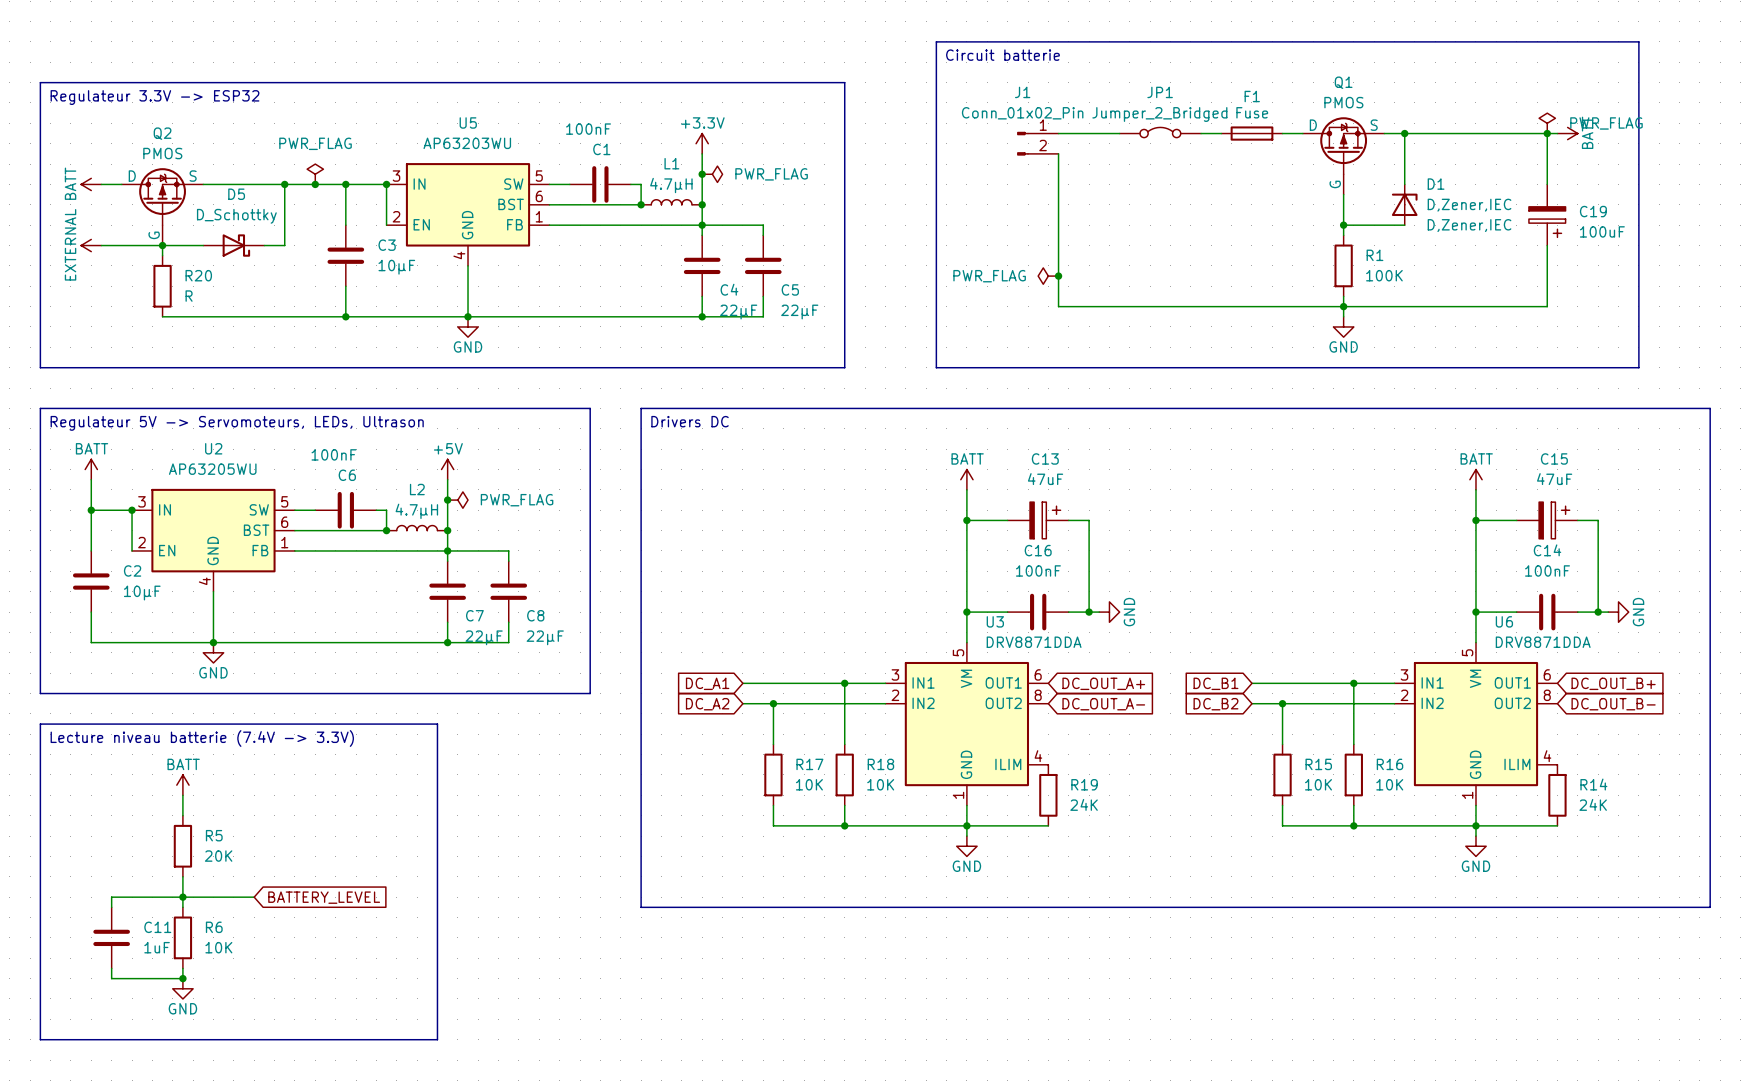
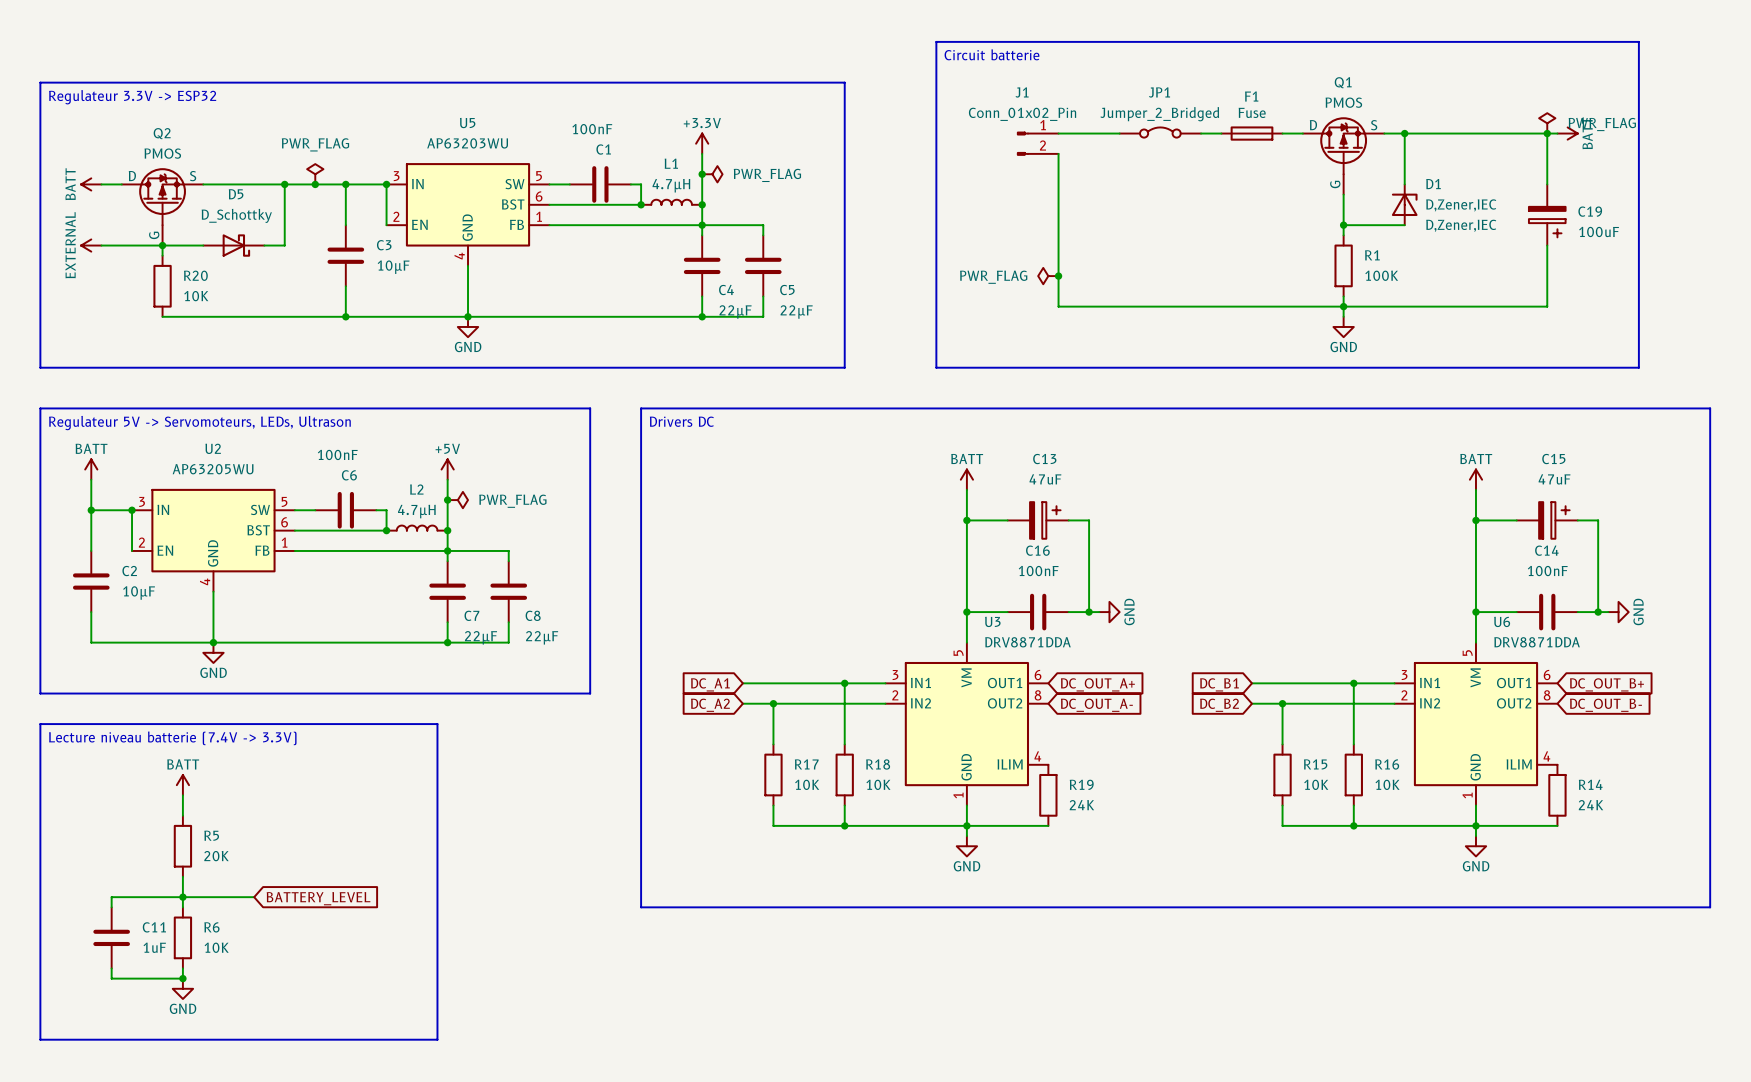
R20 value: R (189, 296) -> 10K (196, 296)

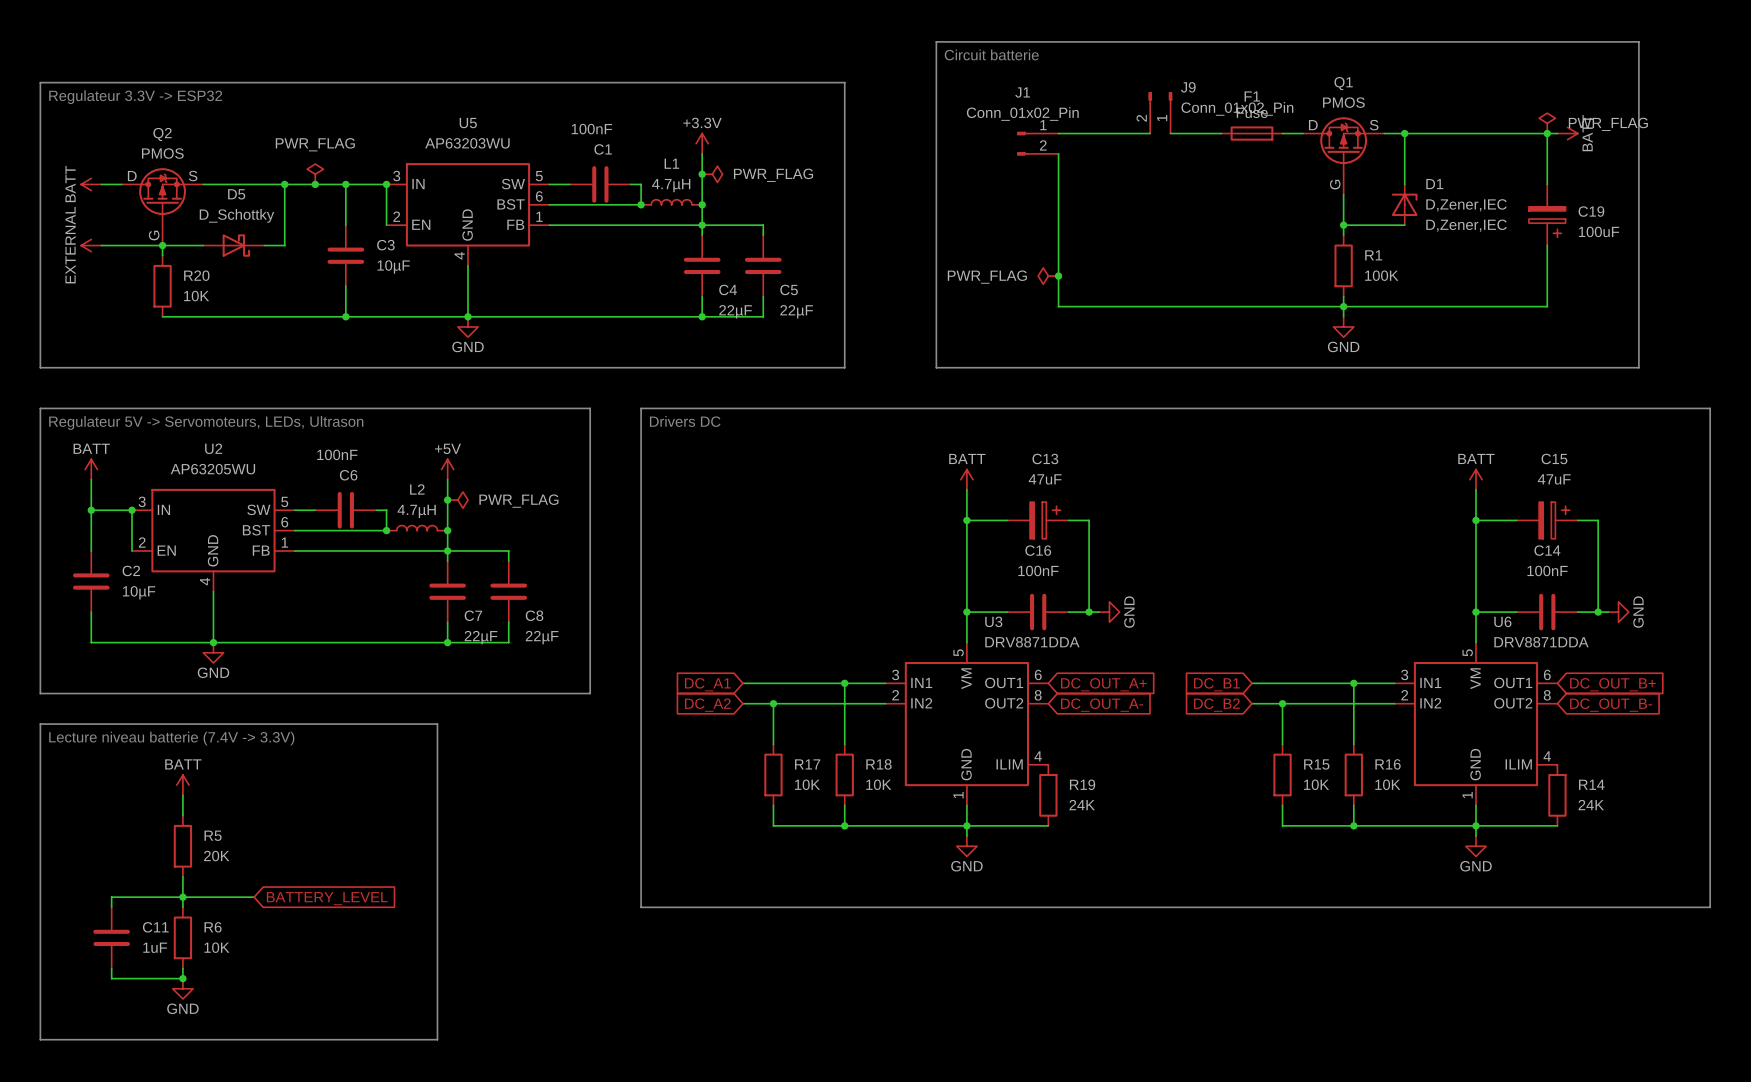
J9: none -> Conn_01x02_Pin (1160, 112)
JP1: Jumper_2_Bridged (1160, 132) -> none

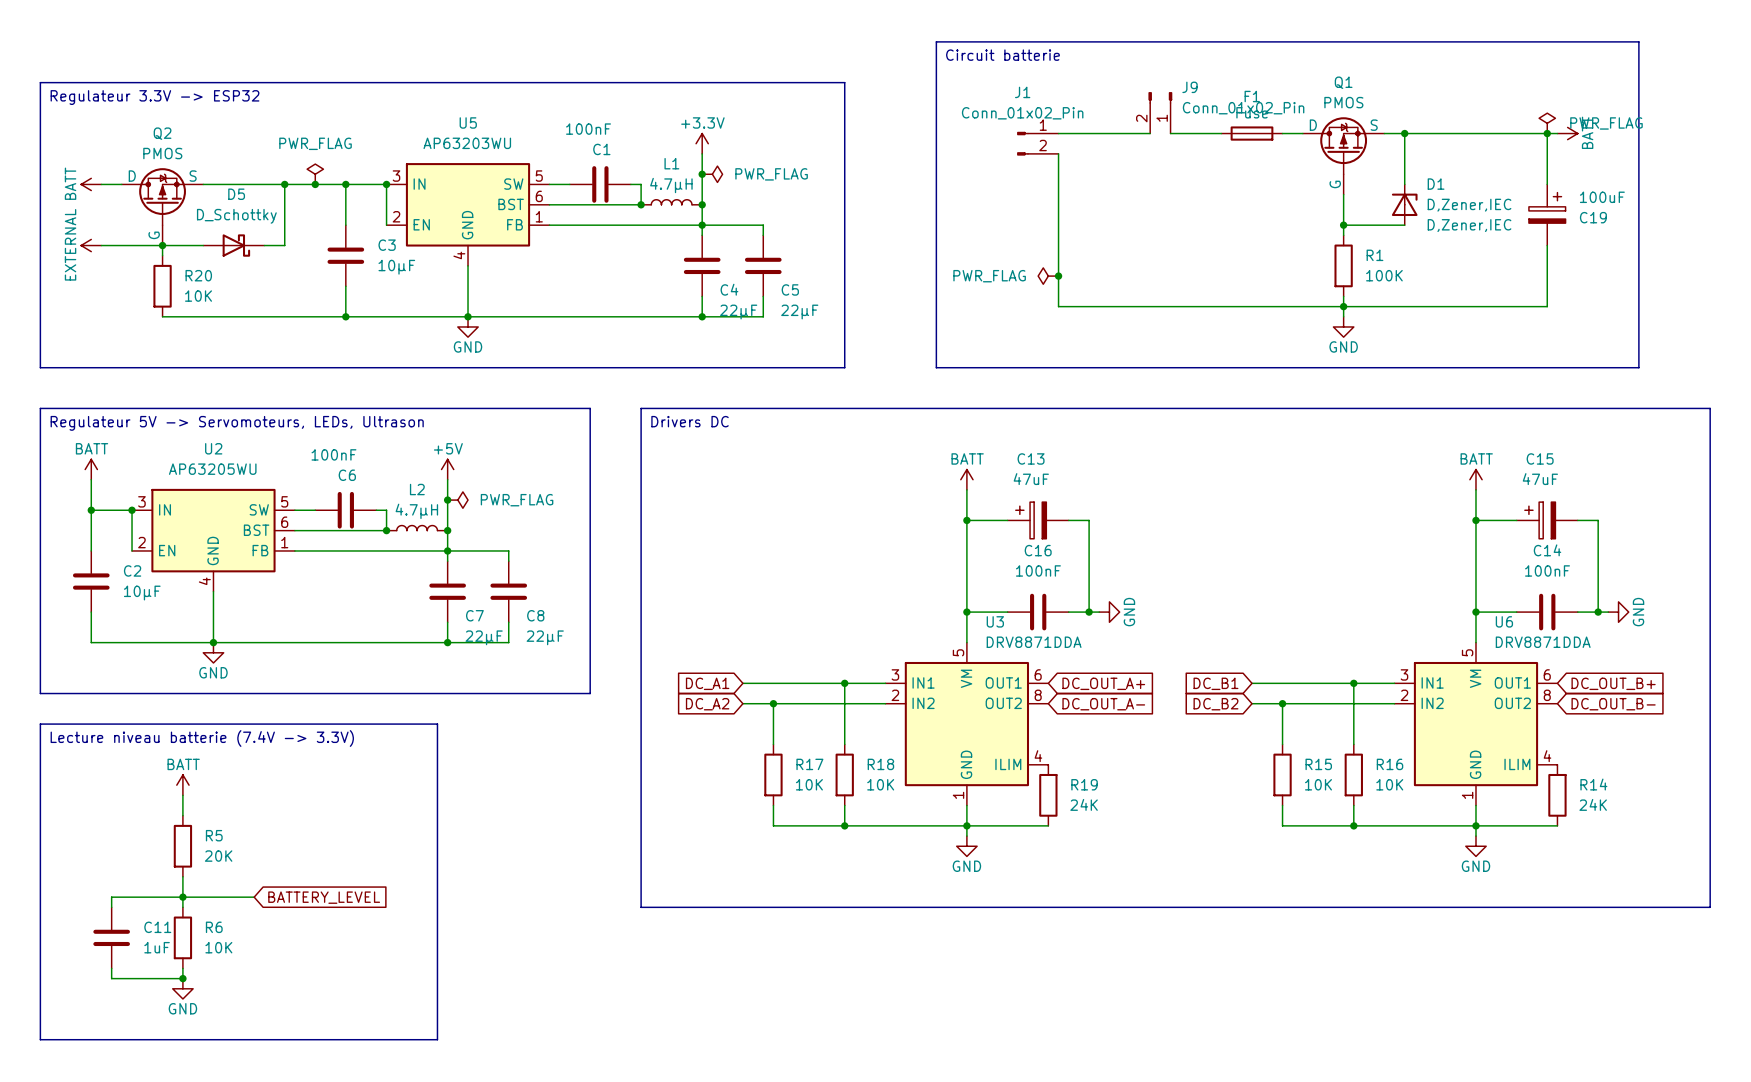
C19 flip: as is (1547, 222) -> up-down (1547, 207)
C13 flip: as is (1045, 520) -> left-right (1031, 520)
C15 flip: as is (1554, 520) -> left-right (1540, 520)

